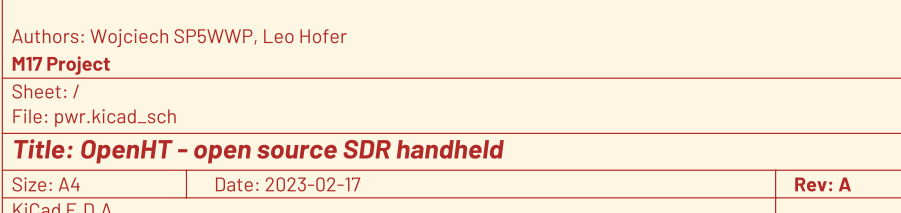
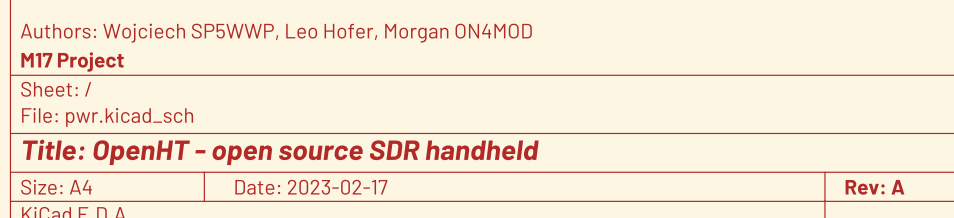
title block: Authors: Wojciech SP5WWP, Leo Hofer (179, 38) -> Authors: Wojciech SP5WWP, Leo Hofer, Morgan ON4MOD (276, 33)

